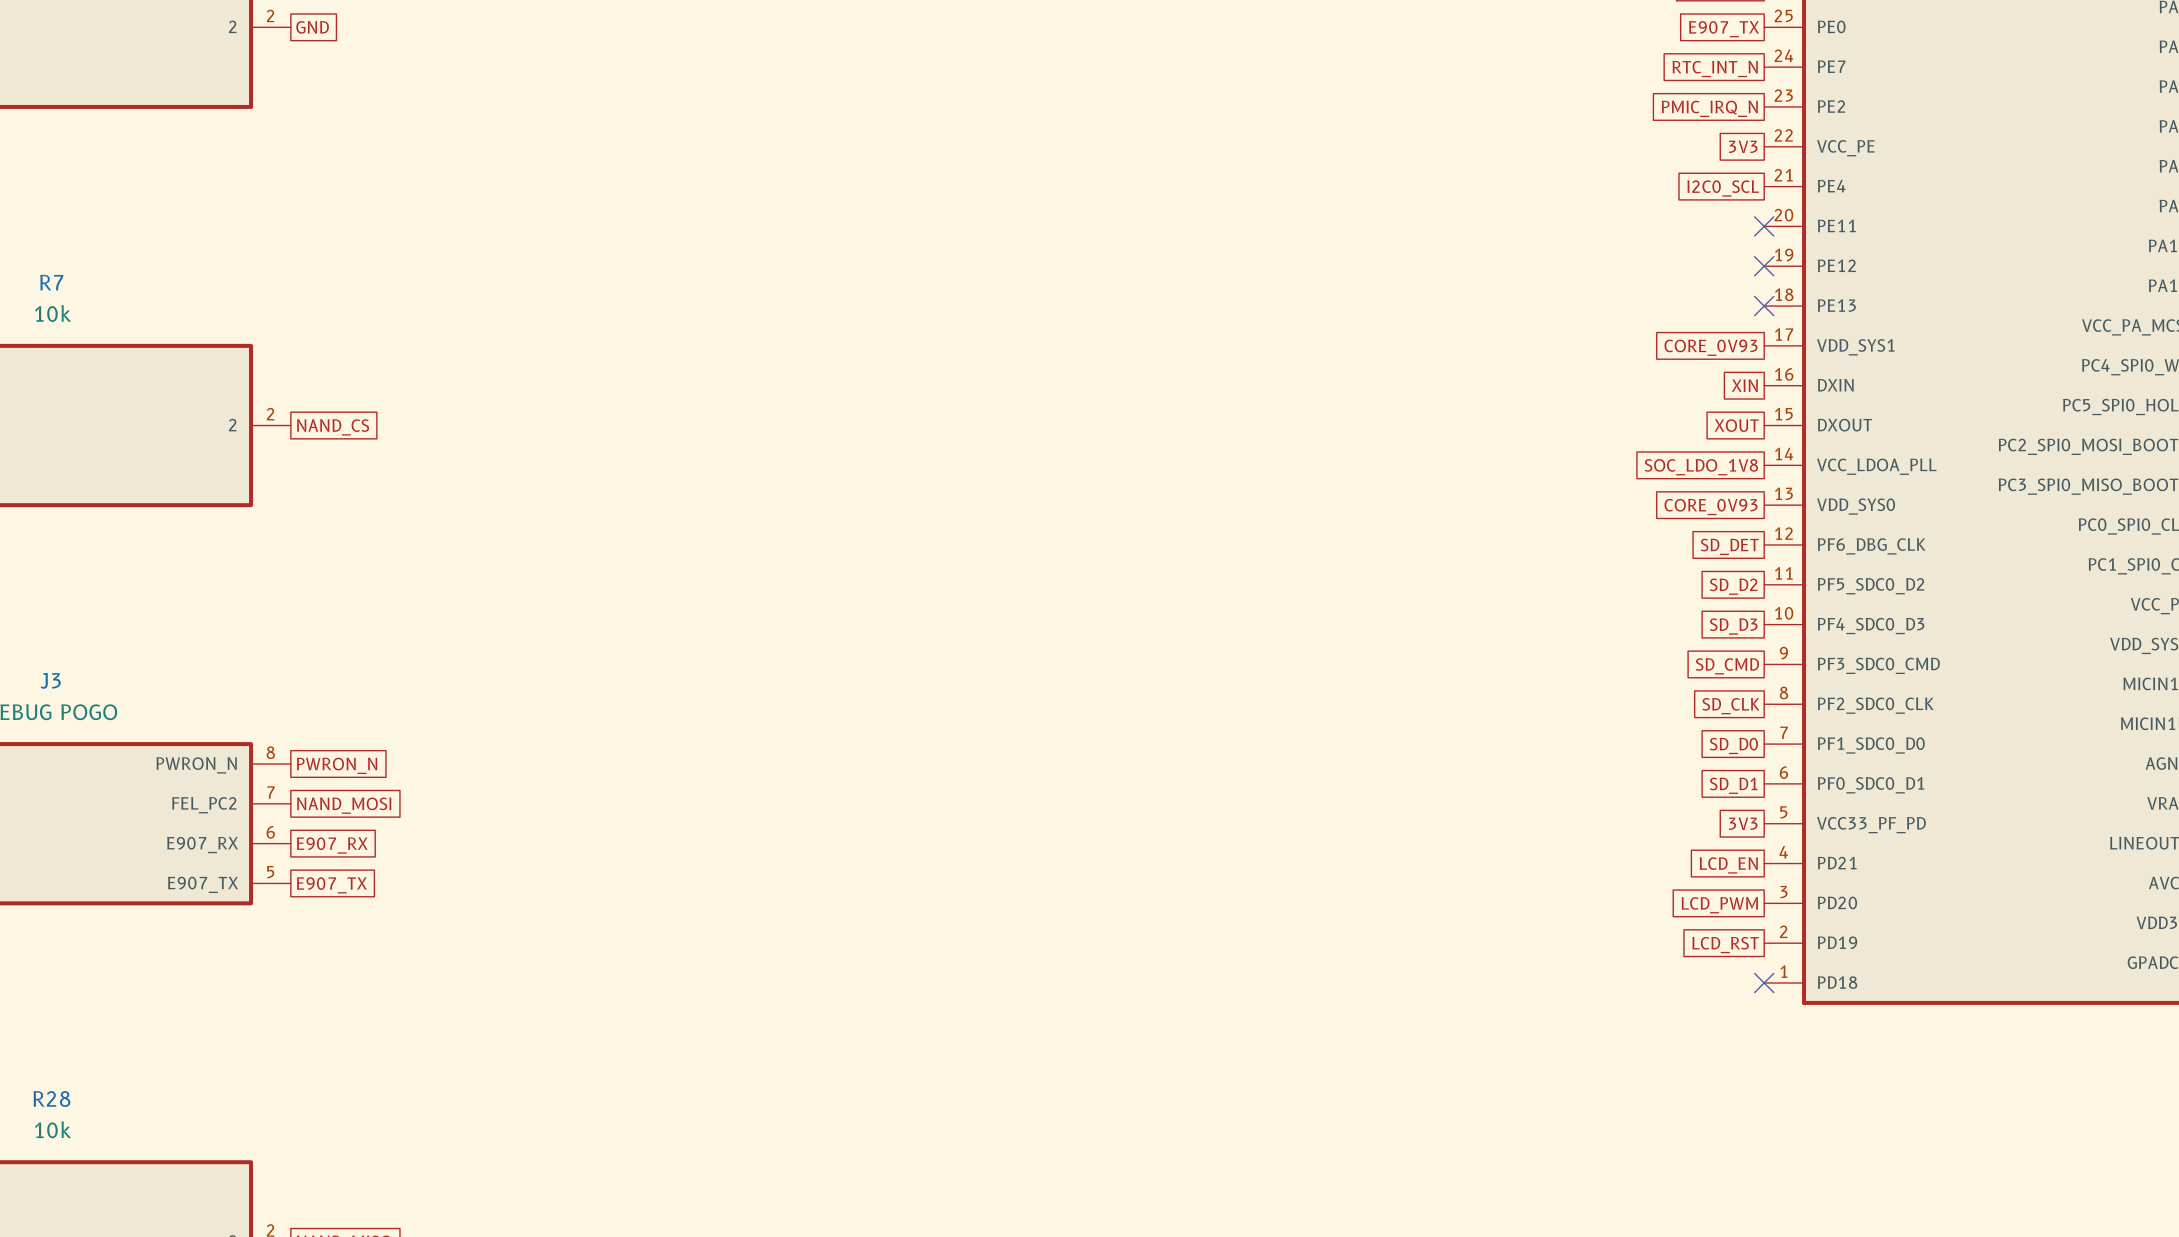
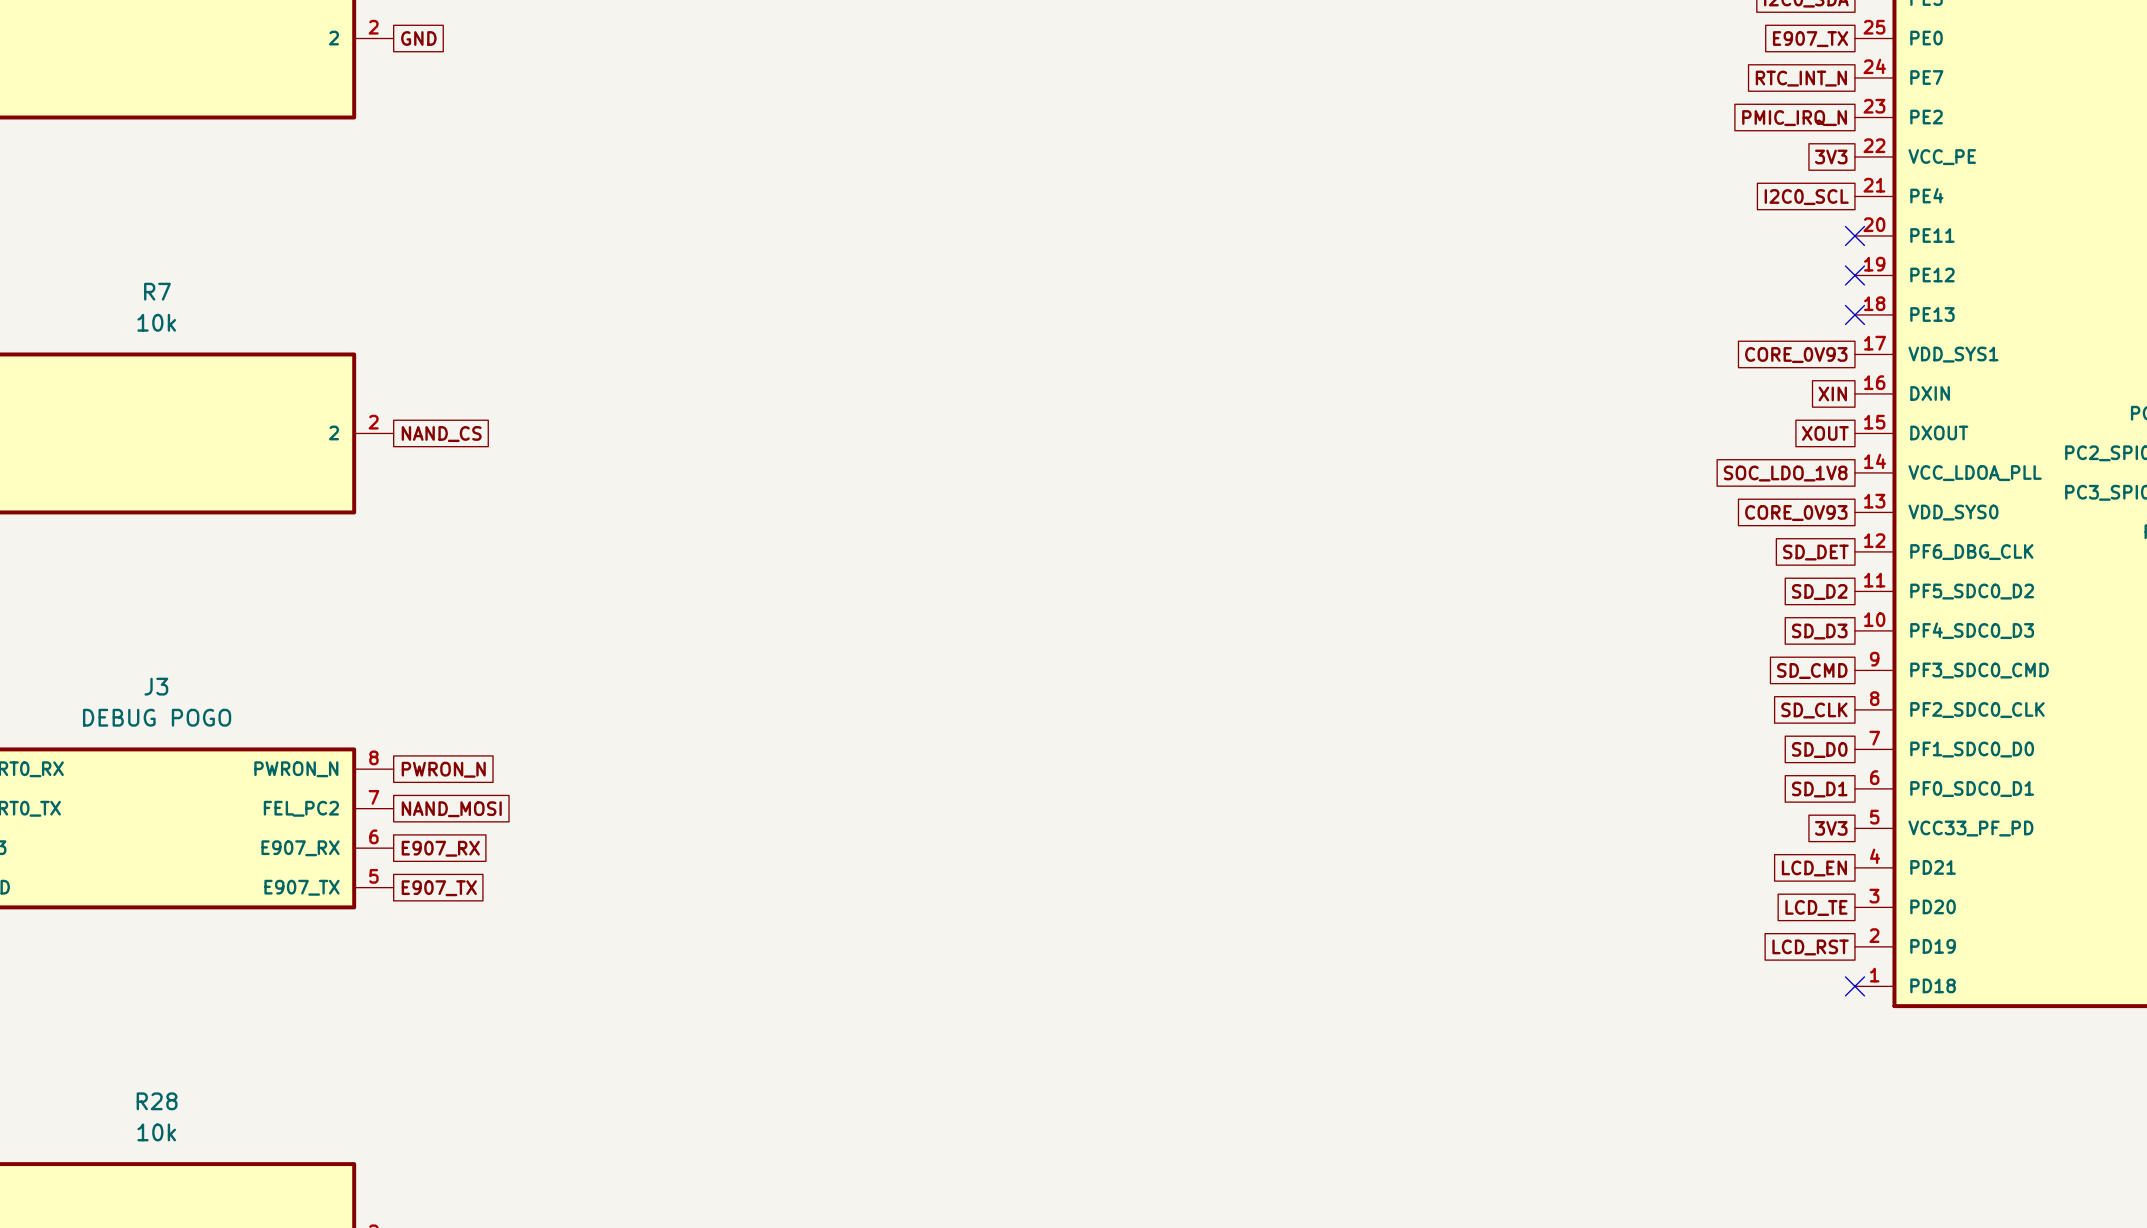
global label: LCD_PWM (1719, 905) -> LCD_TE (1816, 907)

